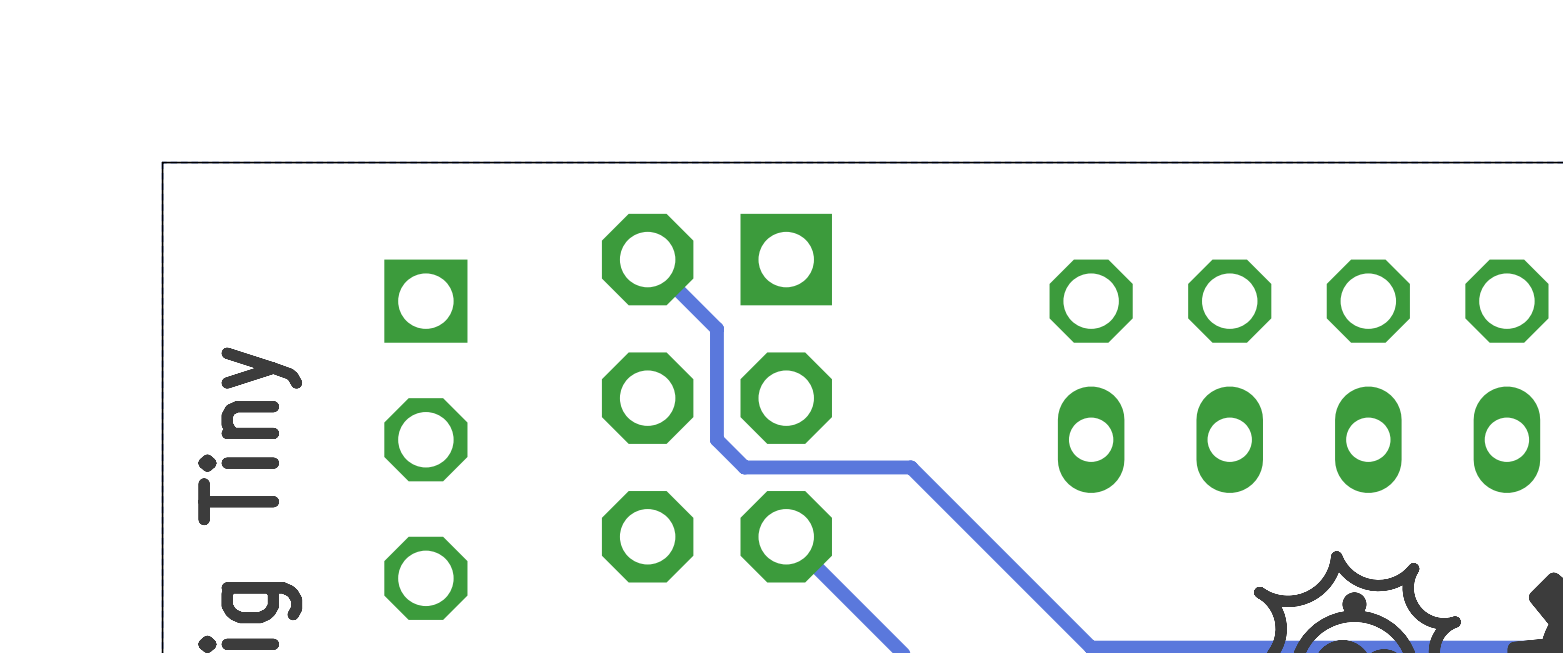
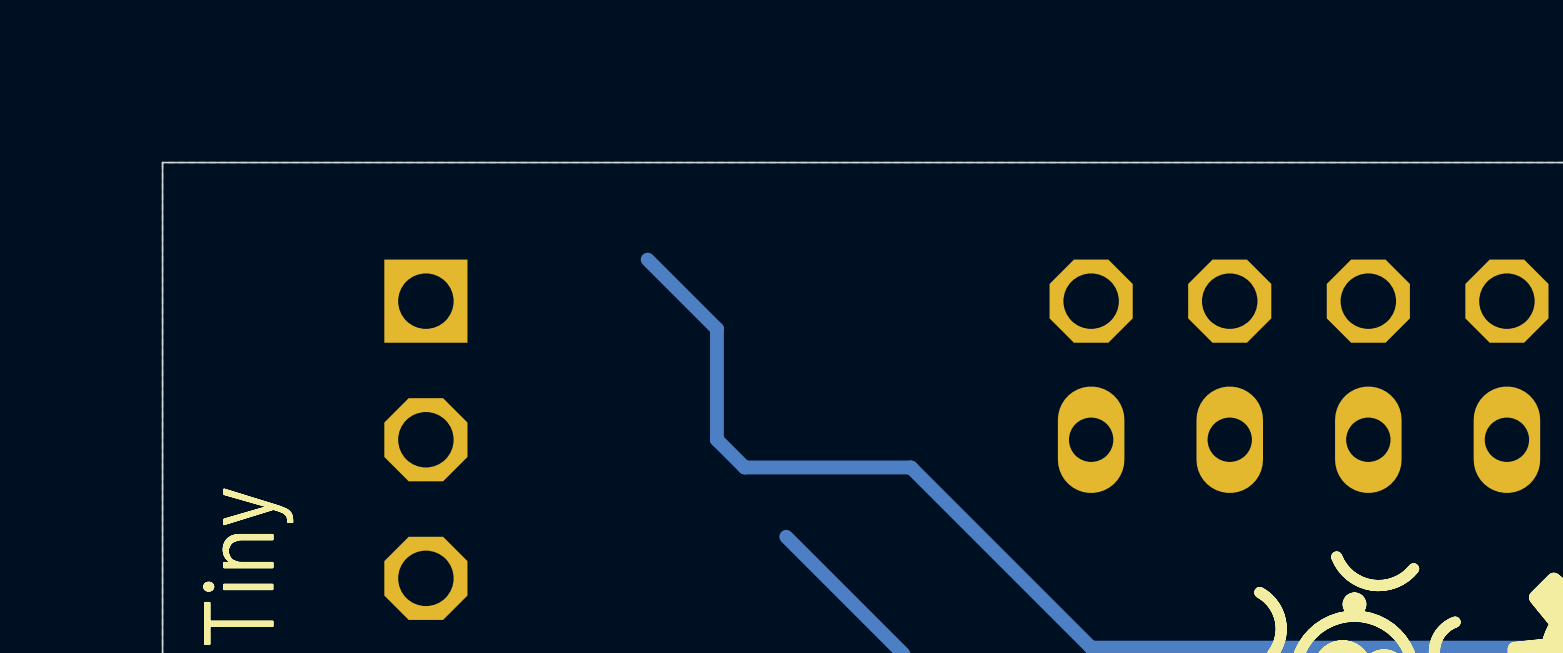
part: (716, 398) -> none
line: (1336, 556) (1335, 563) (1333, 569) (1331, 575) (1327, 580) (1323, 585) (1319, 590) (1314, 593) (1308, 596) (1302, 599) (1296, 600) (1289, 601) (1283, 601) (1277, 600) (1271, 598) (1265, 595) (1259, 592) (1264, 595) (1269, 597) (1275, 599) (1280, 600) (1286, 601) (1292, 601) (1297, 600) (1303, 599) (1308, 596) (1313, 594) (1318, 591) (1322, 587) (1326, 582) (1329, 578) (1332, 573) (1334, 568) (1335, 562) (1336, 556) -> none
line: (1413, 568) (1409, 576) (1408, 589) (1409, 598) (1415, 609) (1421, 616) (1433, 622) (1446, 623) (1455, 622) (1450, 623) (1446, 623) (1442, 623) (1433, 622) (1429, 620) (1421, 616) (1418, 613) (1415, 609) (1411, 602) (1409, 598) (1408, 594) (1408, 589) (1408, 585) (1409, 576) (1411, 572) (1413, 568) -> none

